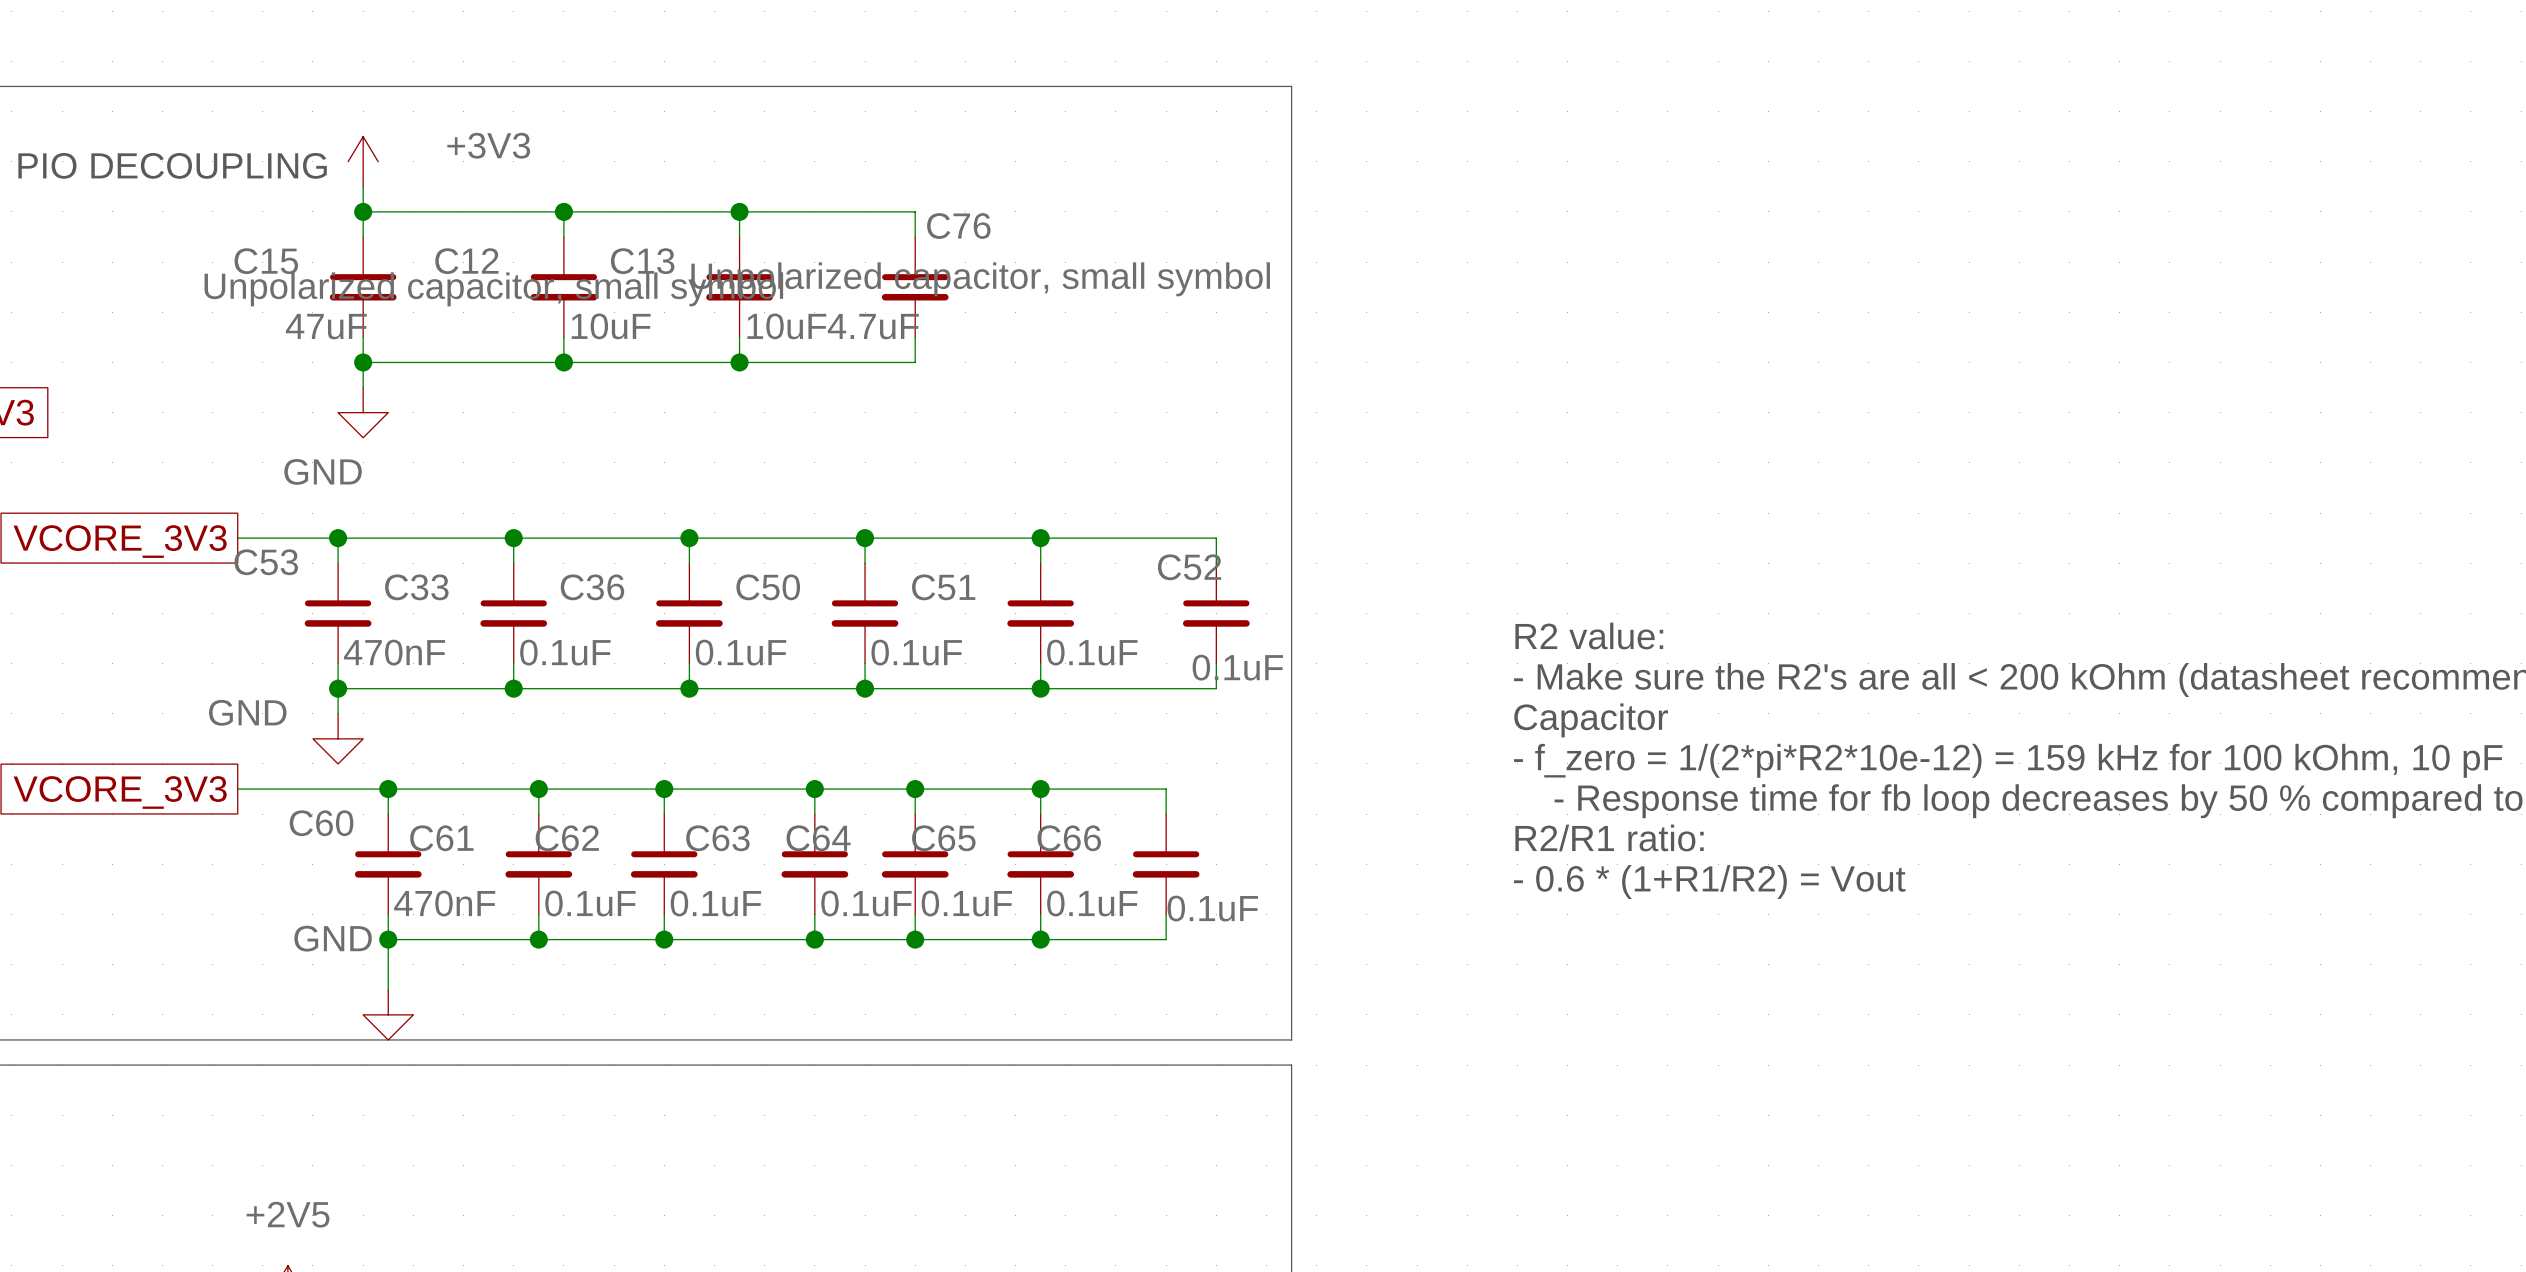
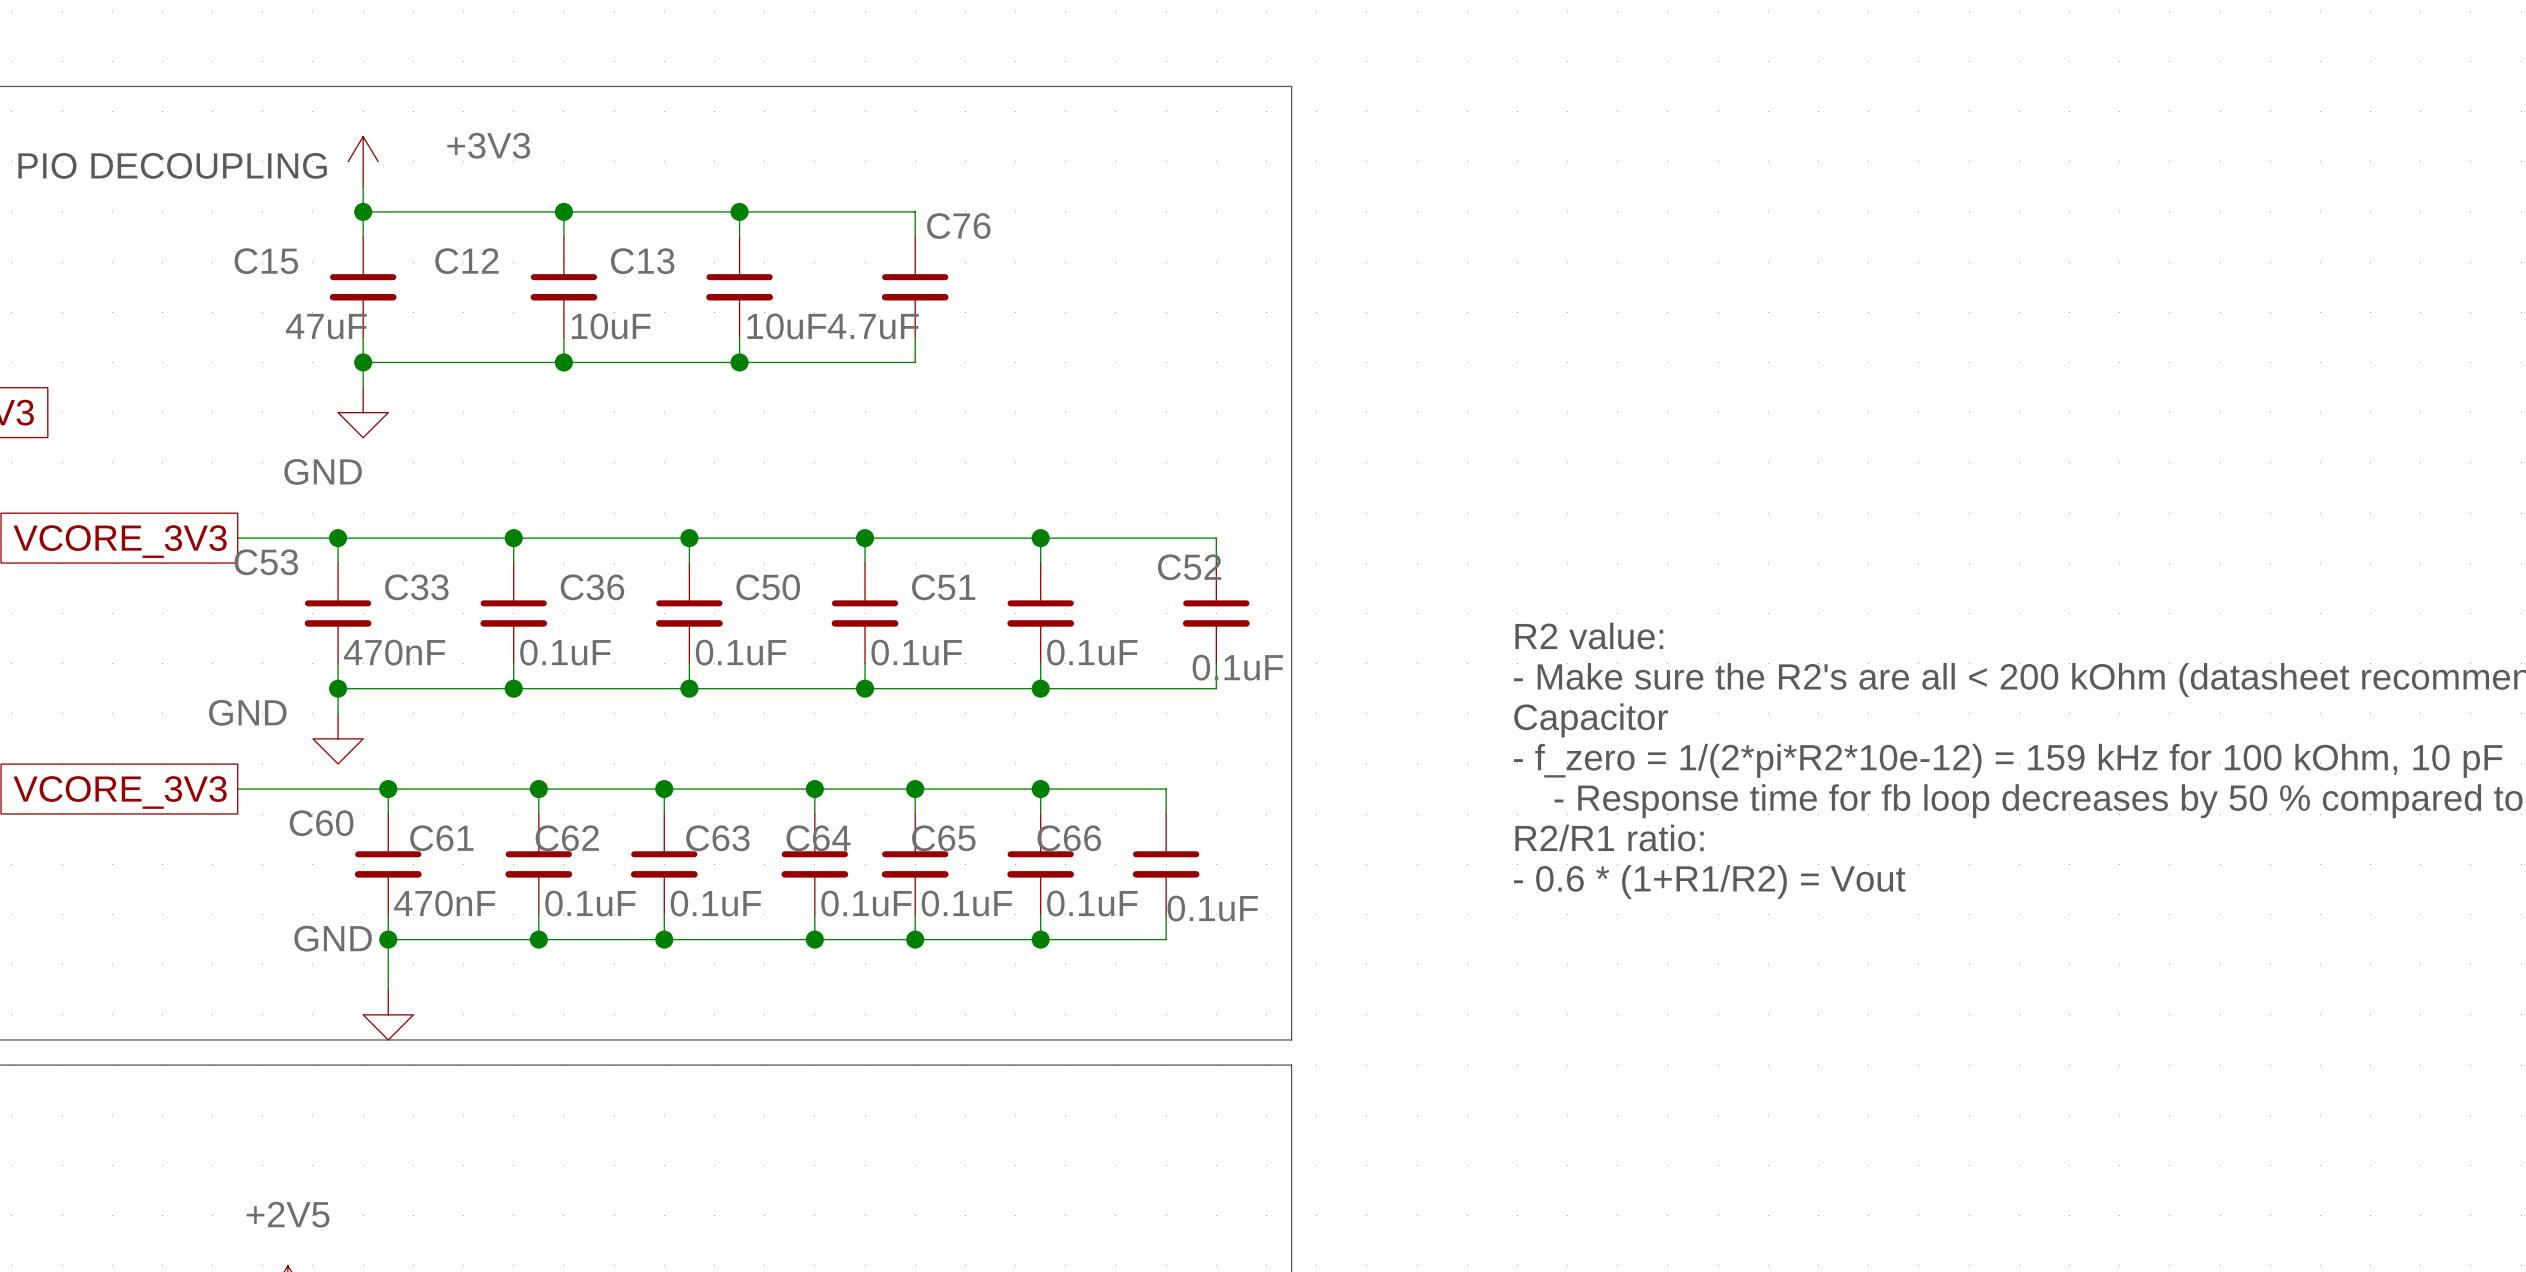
C76 text: Unpolarized capacitor, small symbol (980, 279) -> none
C15 text: Unpolarized capacitor, small symbol (493, 289) -> none

